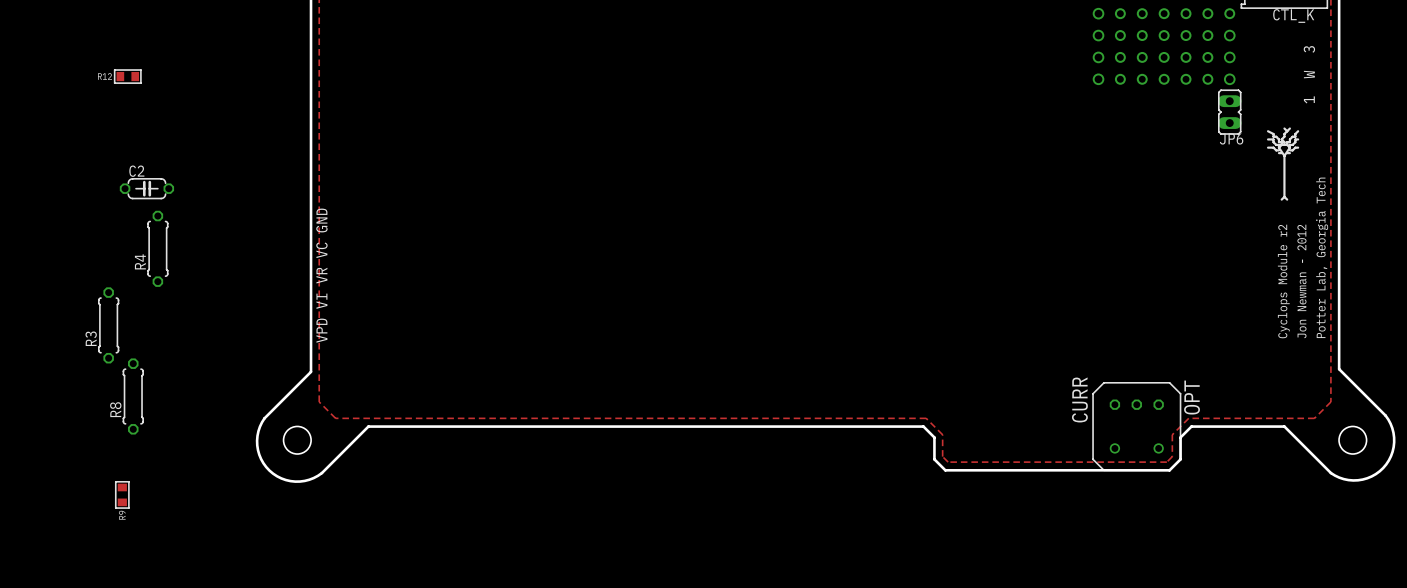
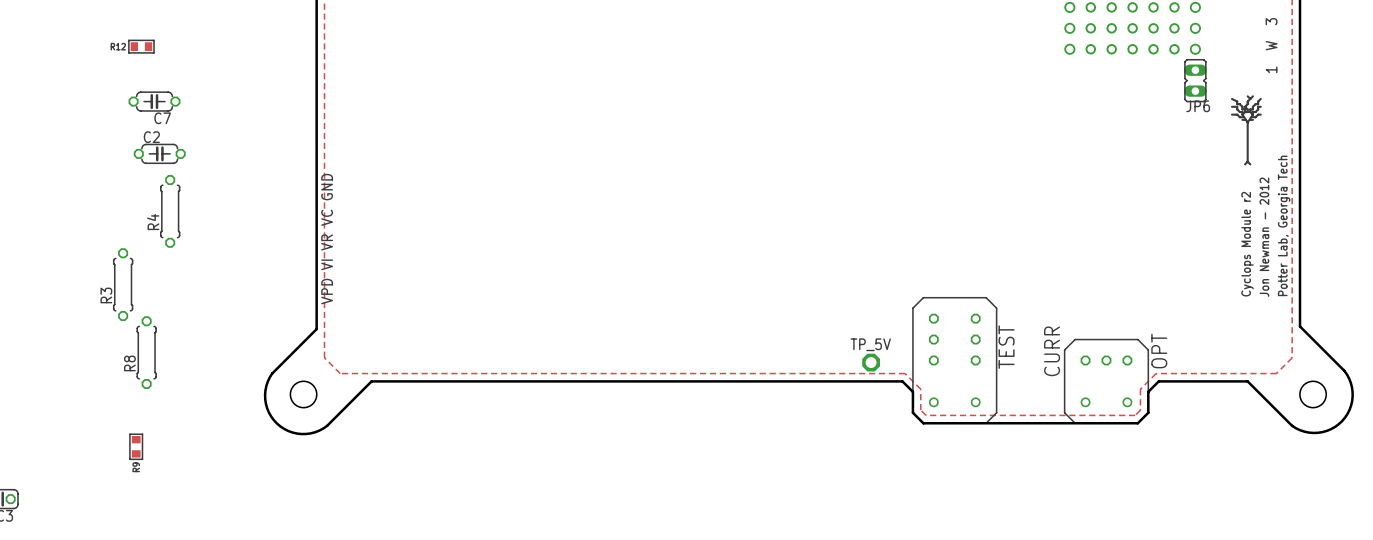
C7: none -> (154, 101)
TEST: none -> (954, 360)
TP_5V: none -> (871, 362)

